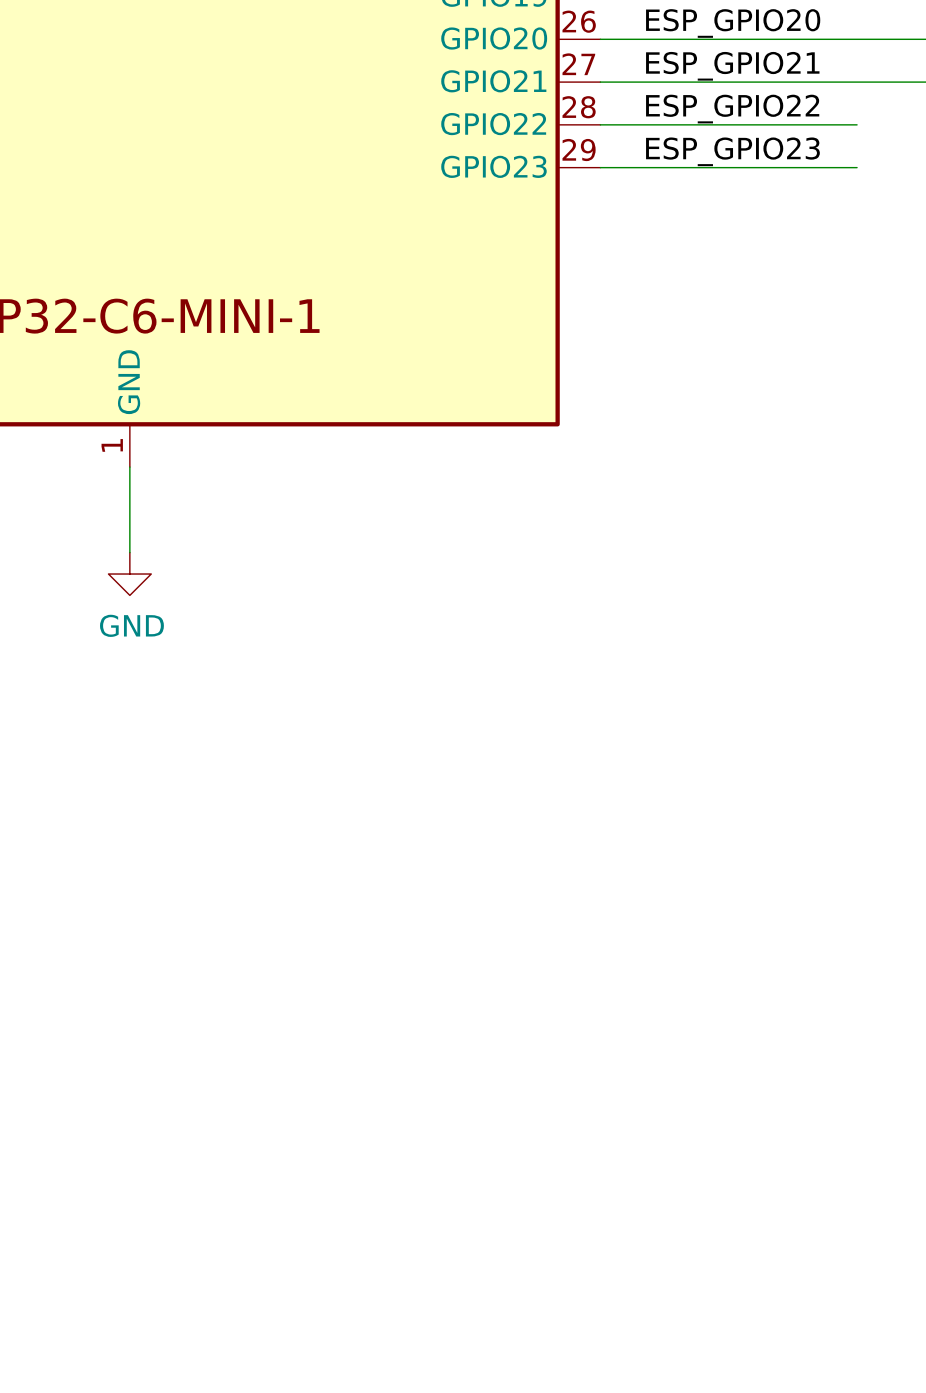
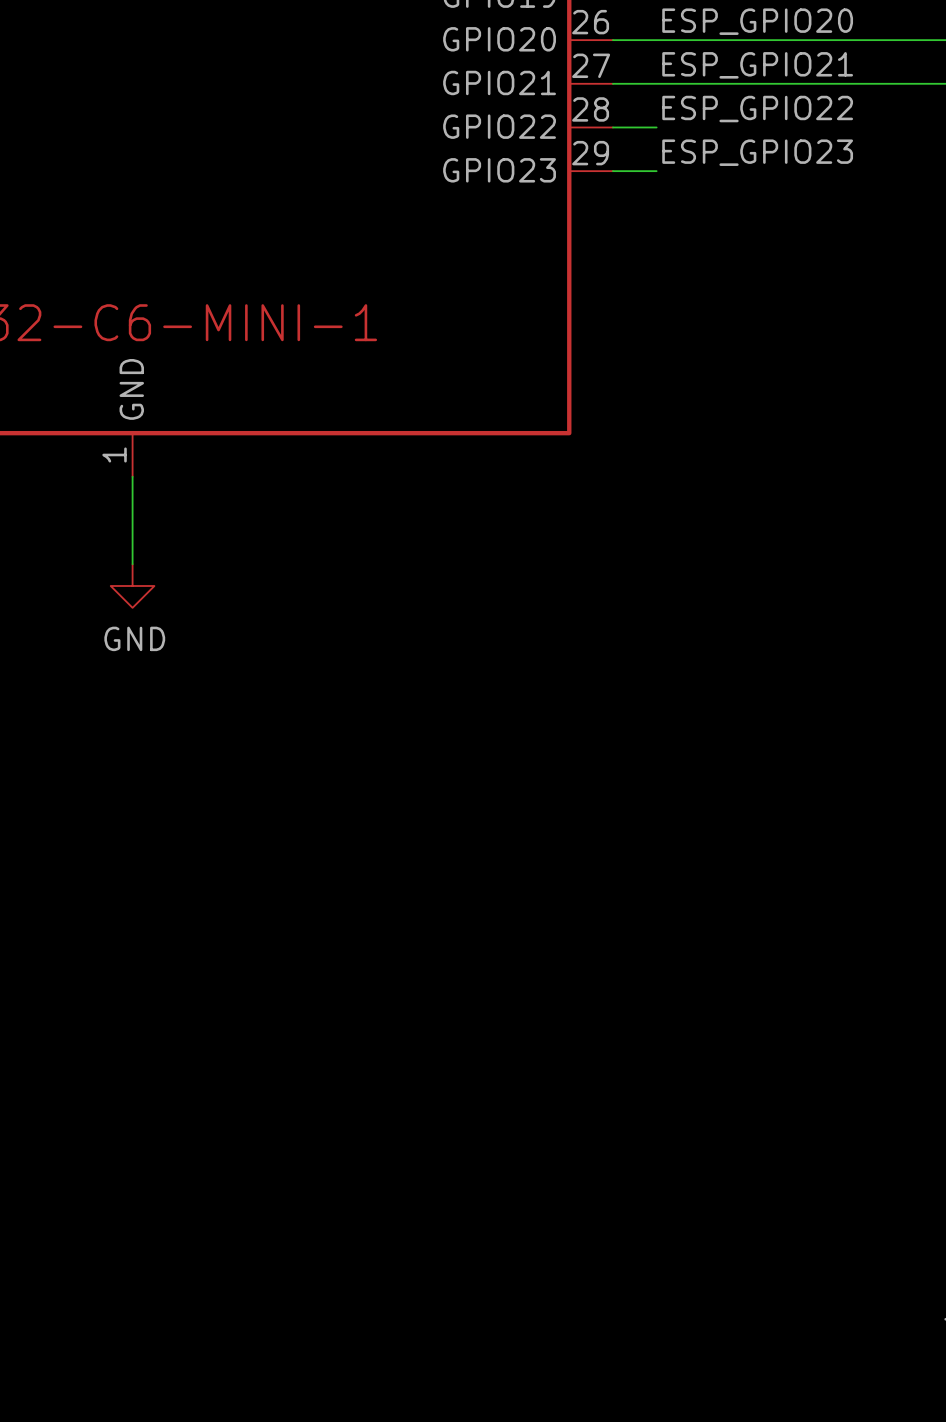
wire: (643, 124) (857, 124) -> none
wire: (643, 167) (857, 167) -> none

